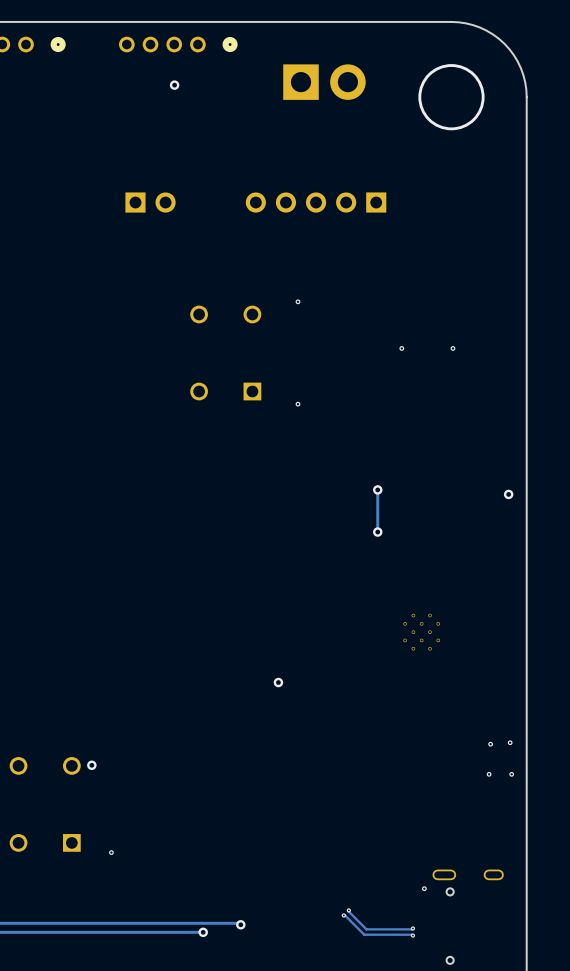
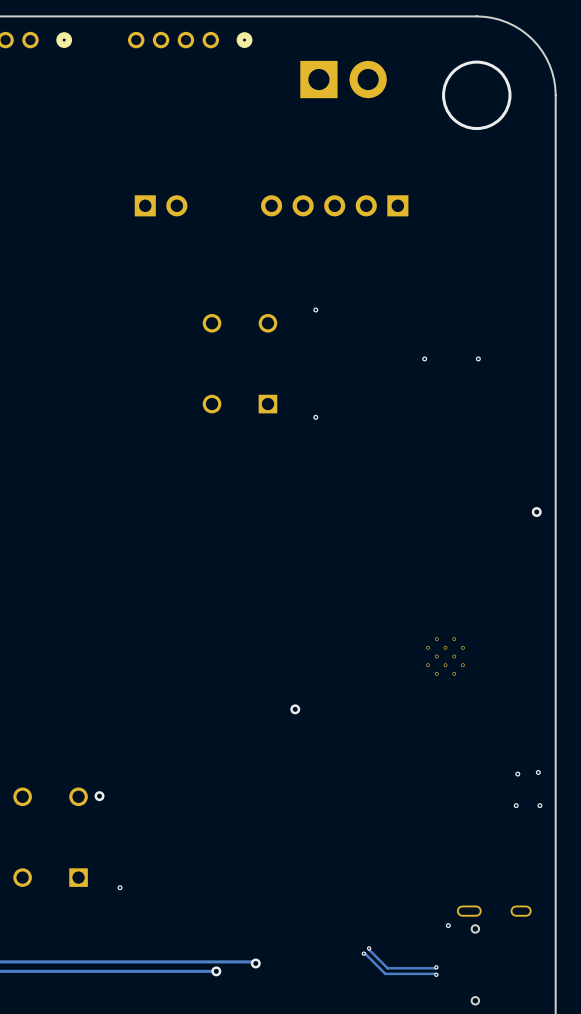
via: (174, 85) -> none
track: (377, 489) (377, 532) -> none
via: (377, 489) -> none
via: (377, 532) -> none

